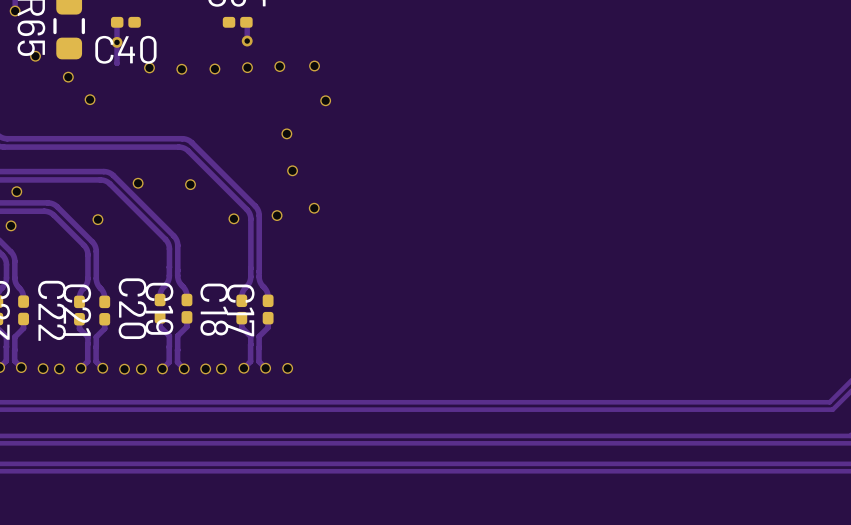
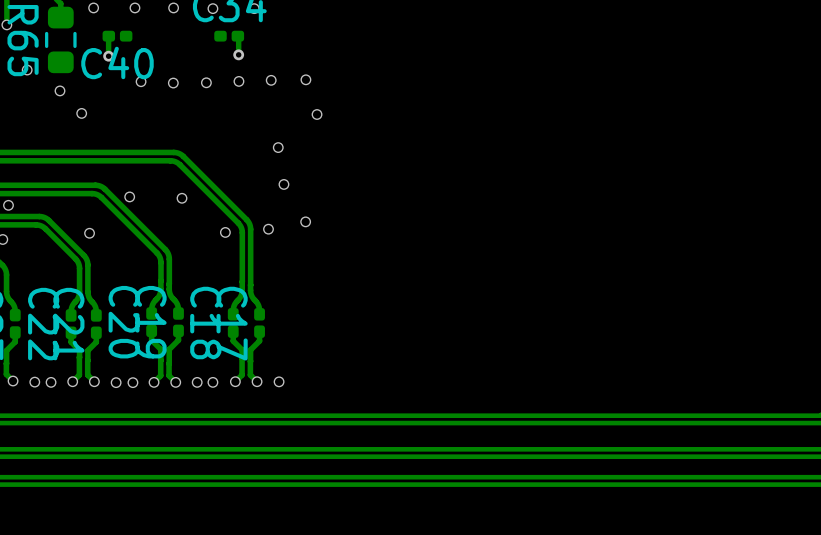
track: (117, 42) (117, 63) -> none

